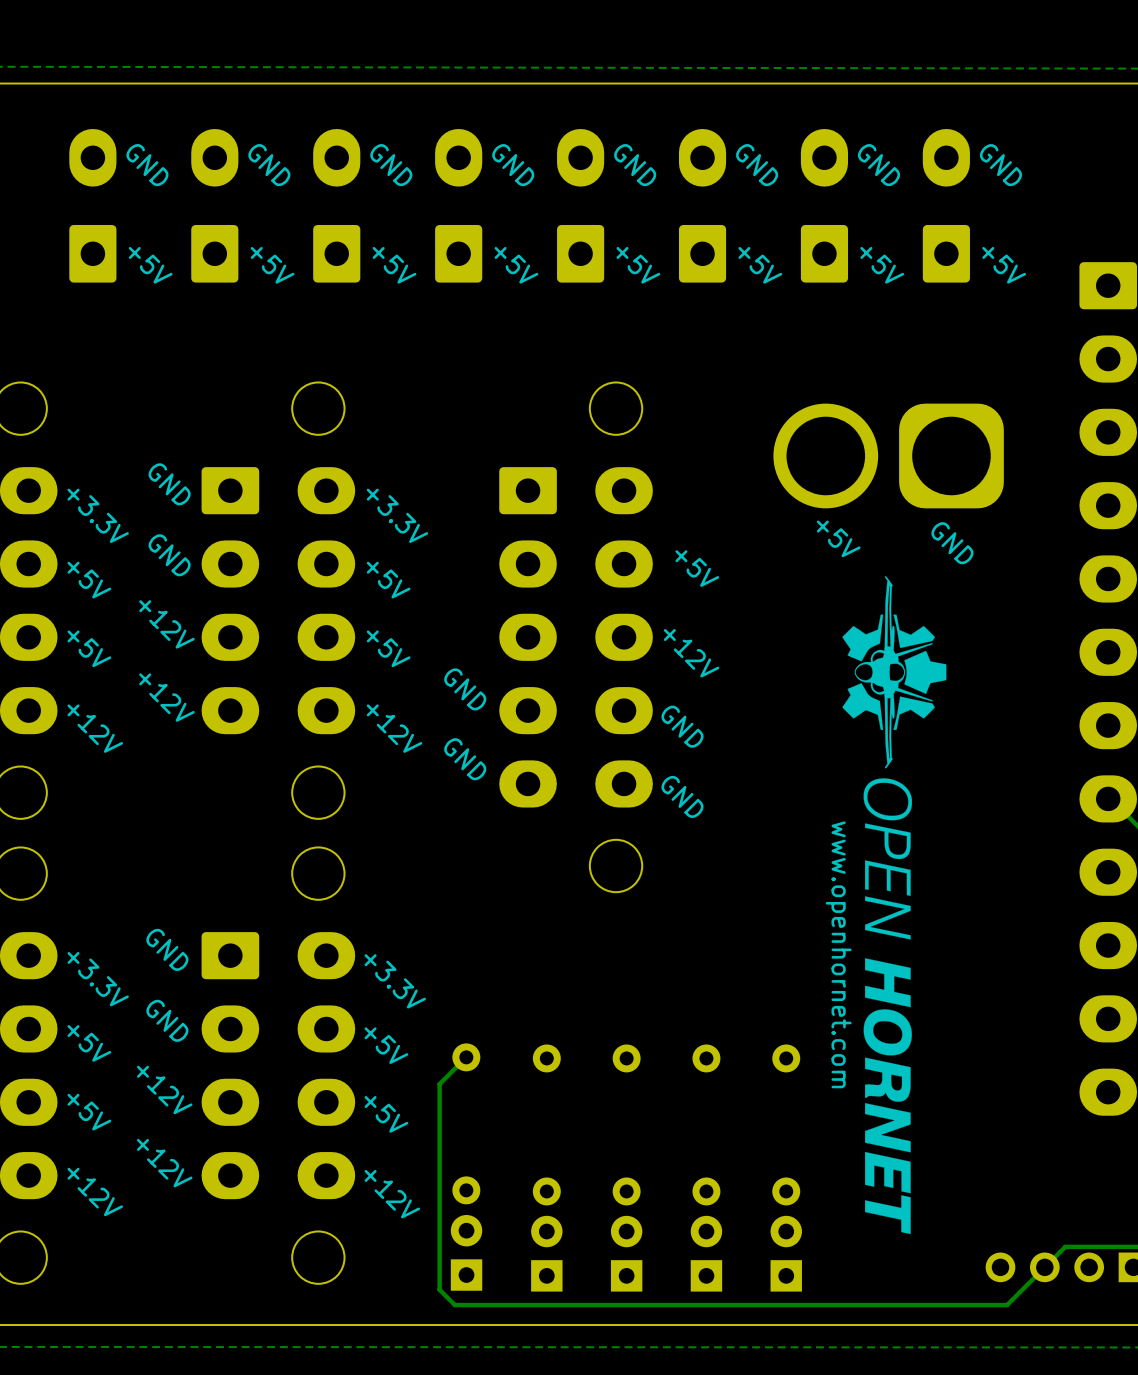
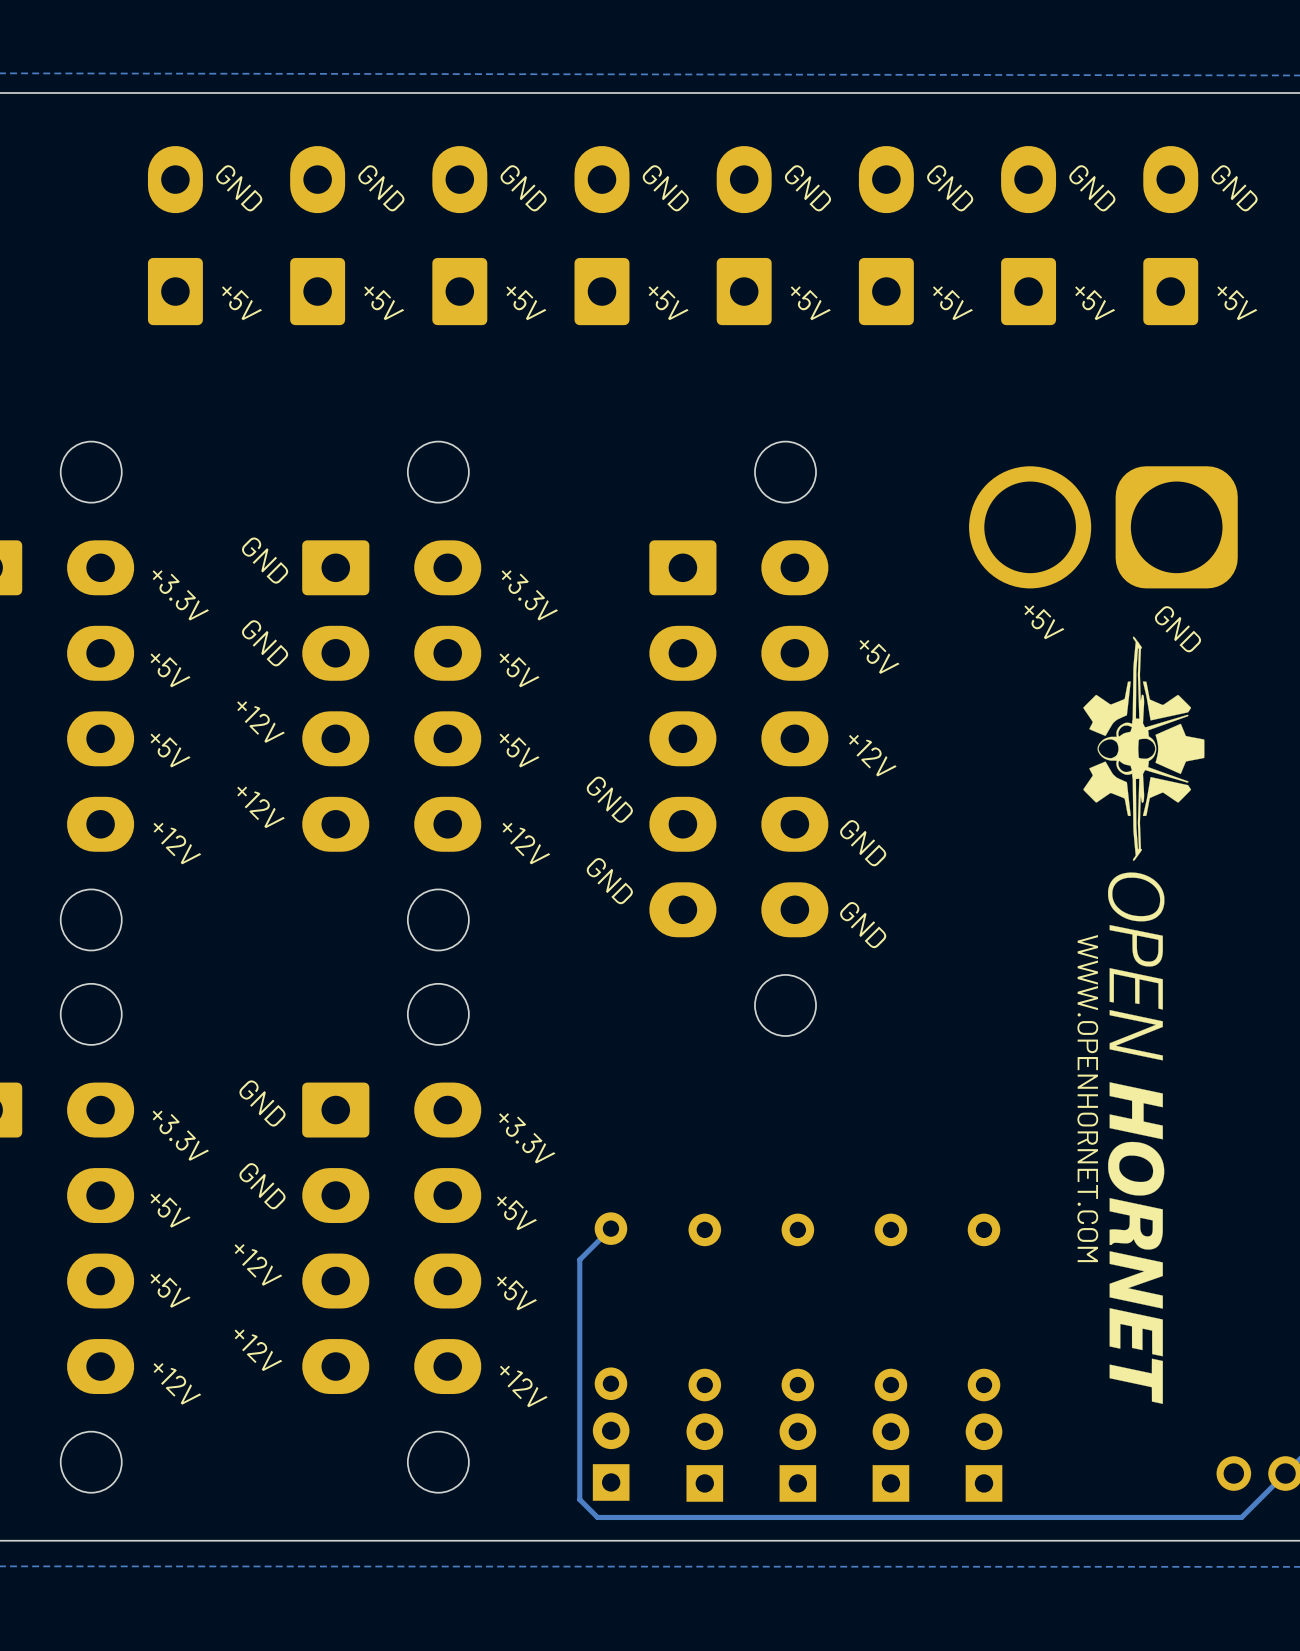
drawing position: (894, 905) -> (1143, 1020)
text: none -> WWW.OPENHORNET.COM (1087, 1098)
text: www.openhornet.com (838, 954) -> none

